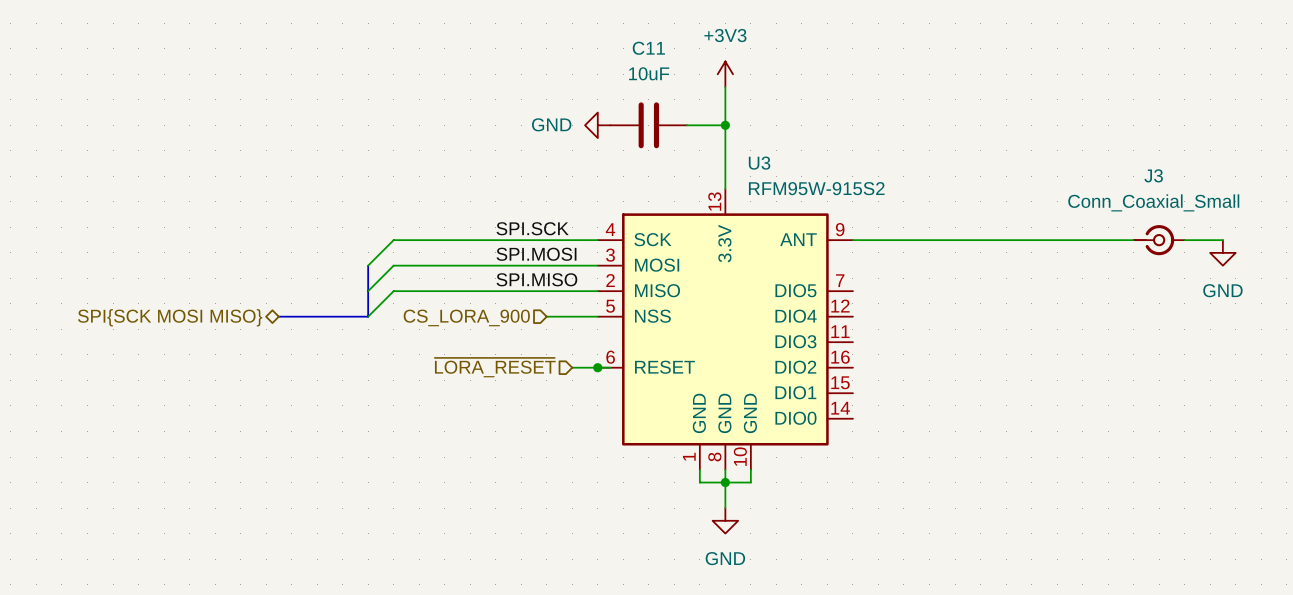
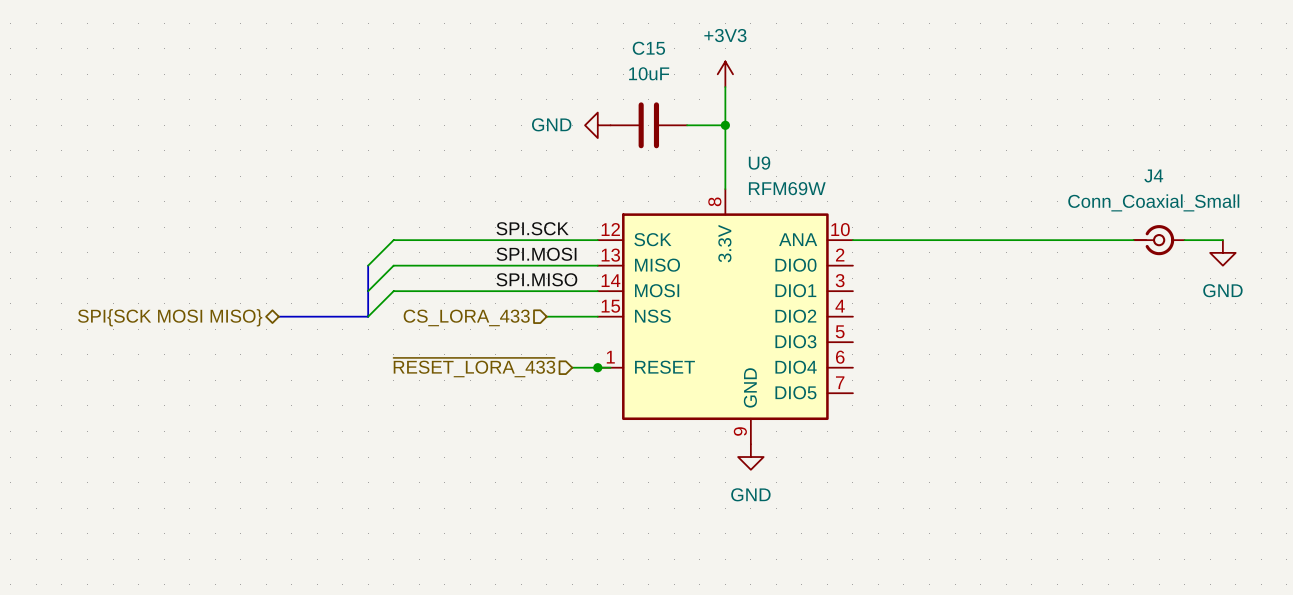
C11 name: C11 (648, 48) -> C15 (648, 48)
J3 name: J3 (1153, 175) -> J4 (1153, 175)
U9: none -> RFM69W (725, 316)
hierarchical label: CS_LORA_900 (466, 317) -> CS_LORA_433 (466, 317)
U3: RFM95W-915S2 (725, 329) -> none
hierarchical label: ~{LORA_RESET} (495, 367) -> ~{RESET_LORA_433} (474, 367)
wire: (699, 469) (699, 482) (750, 482) (750, 469) -> none
wire: (725, 469) (725, 508) -> none
junction: (725, 482) -> none
power symbol position: GND (725, 520) -> GND (750, 457)

